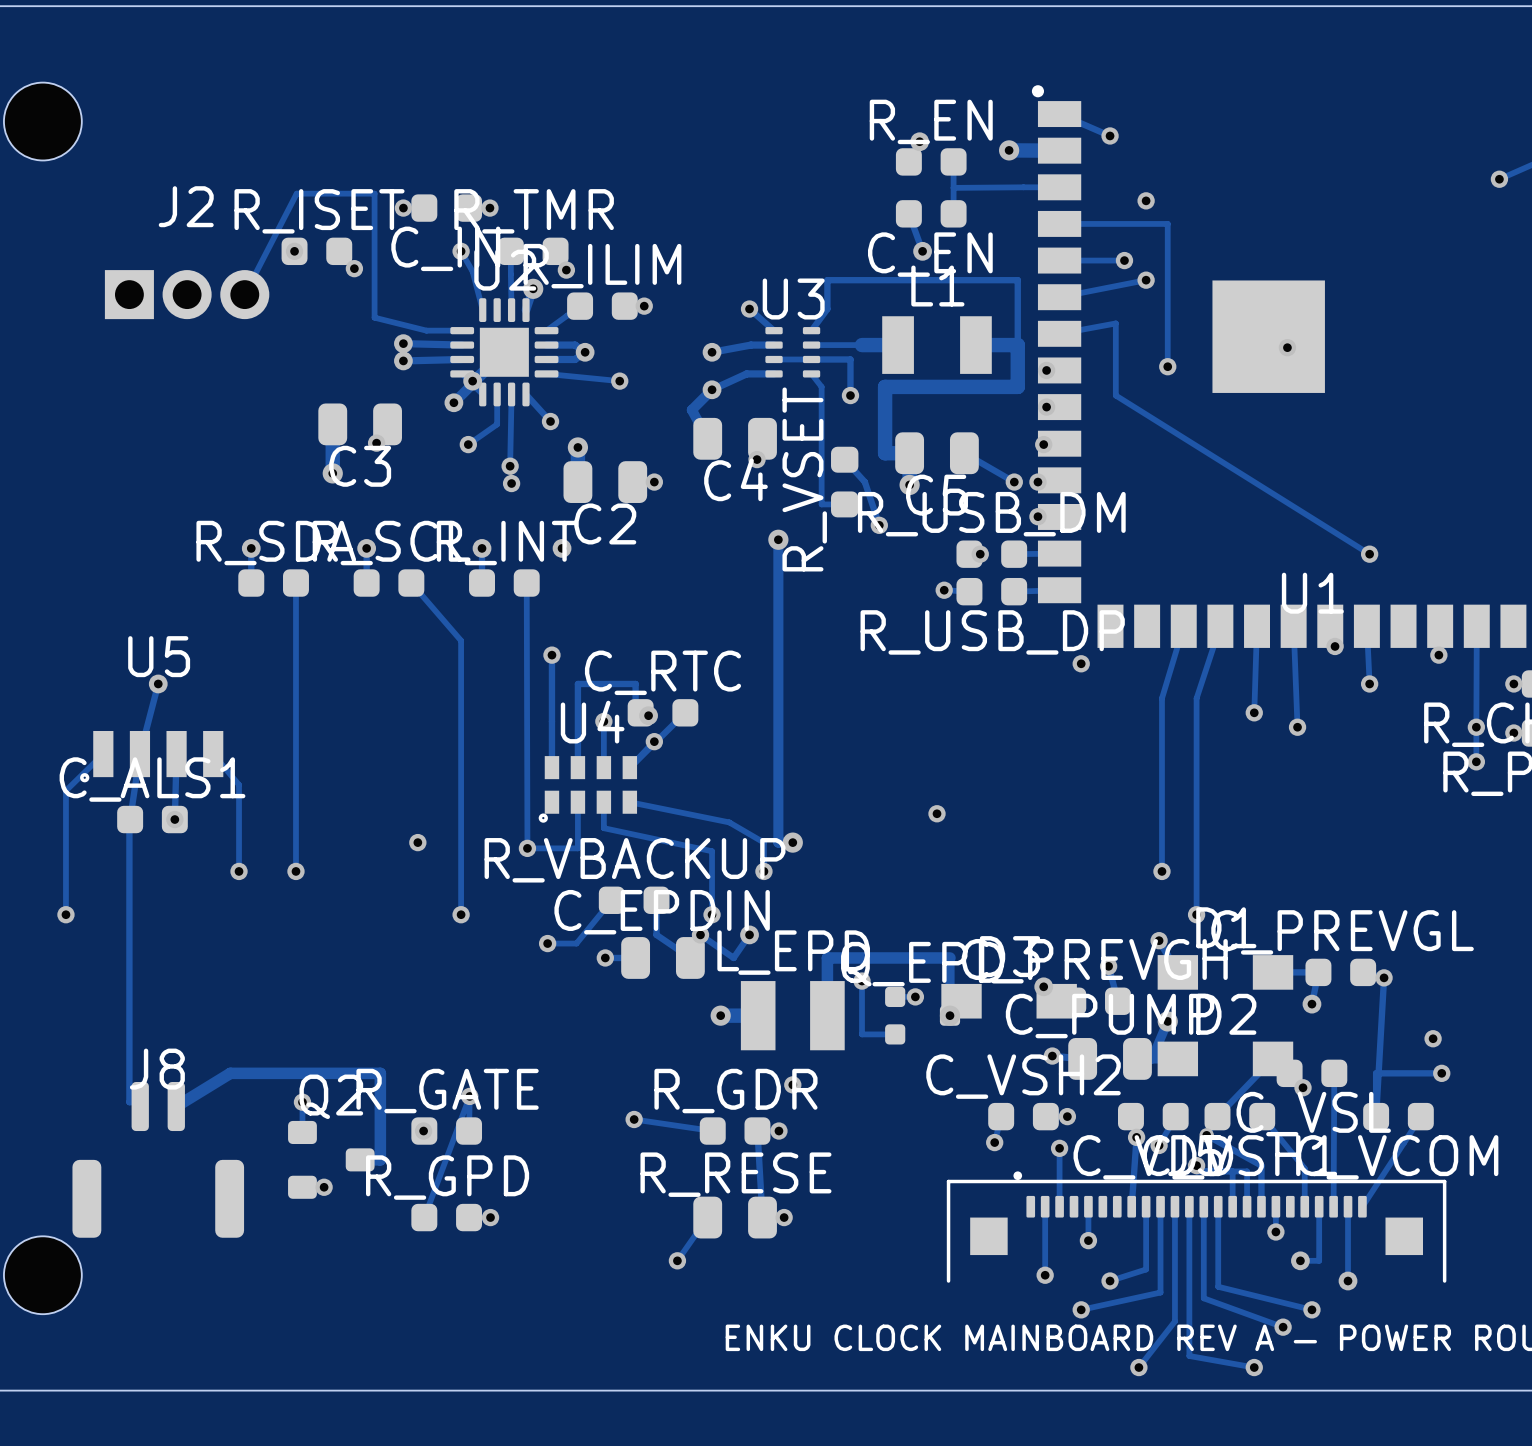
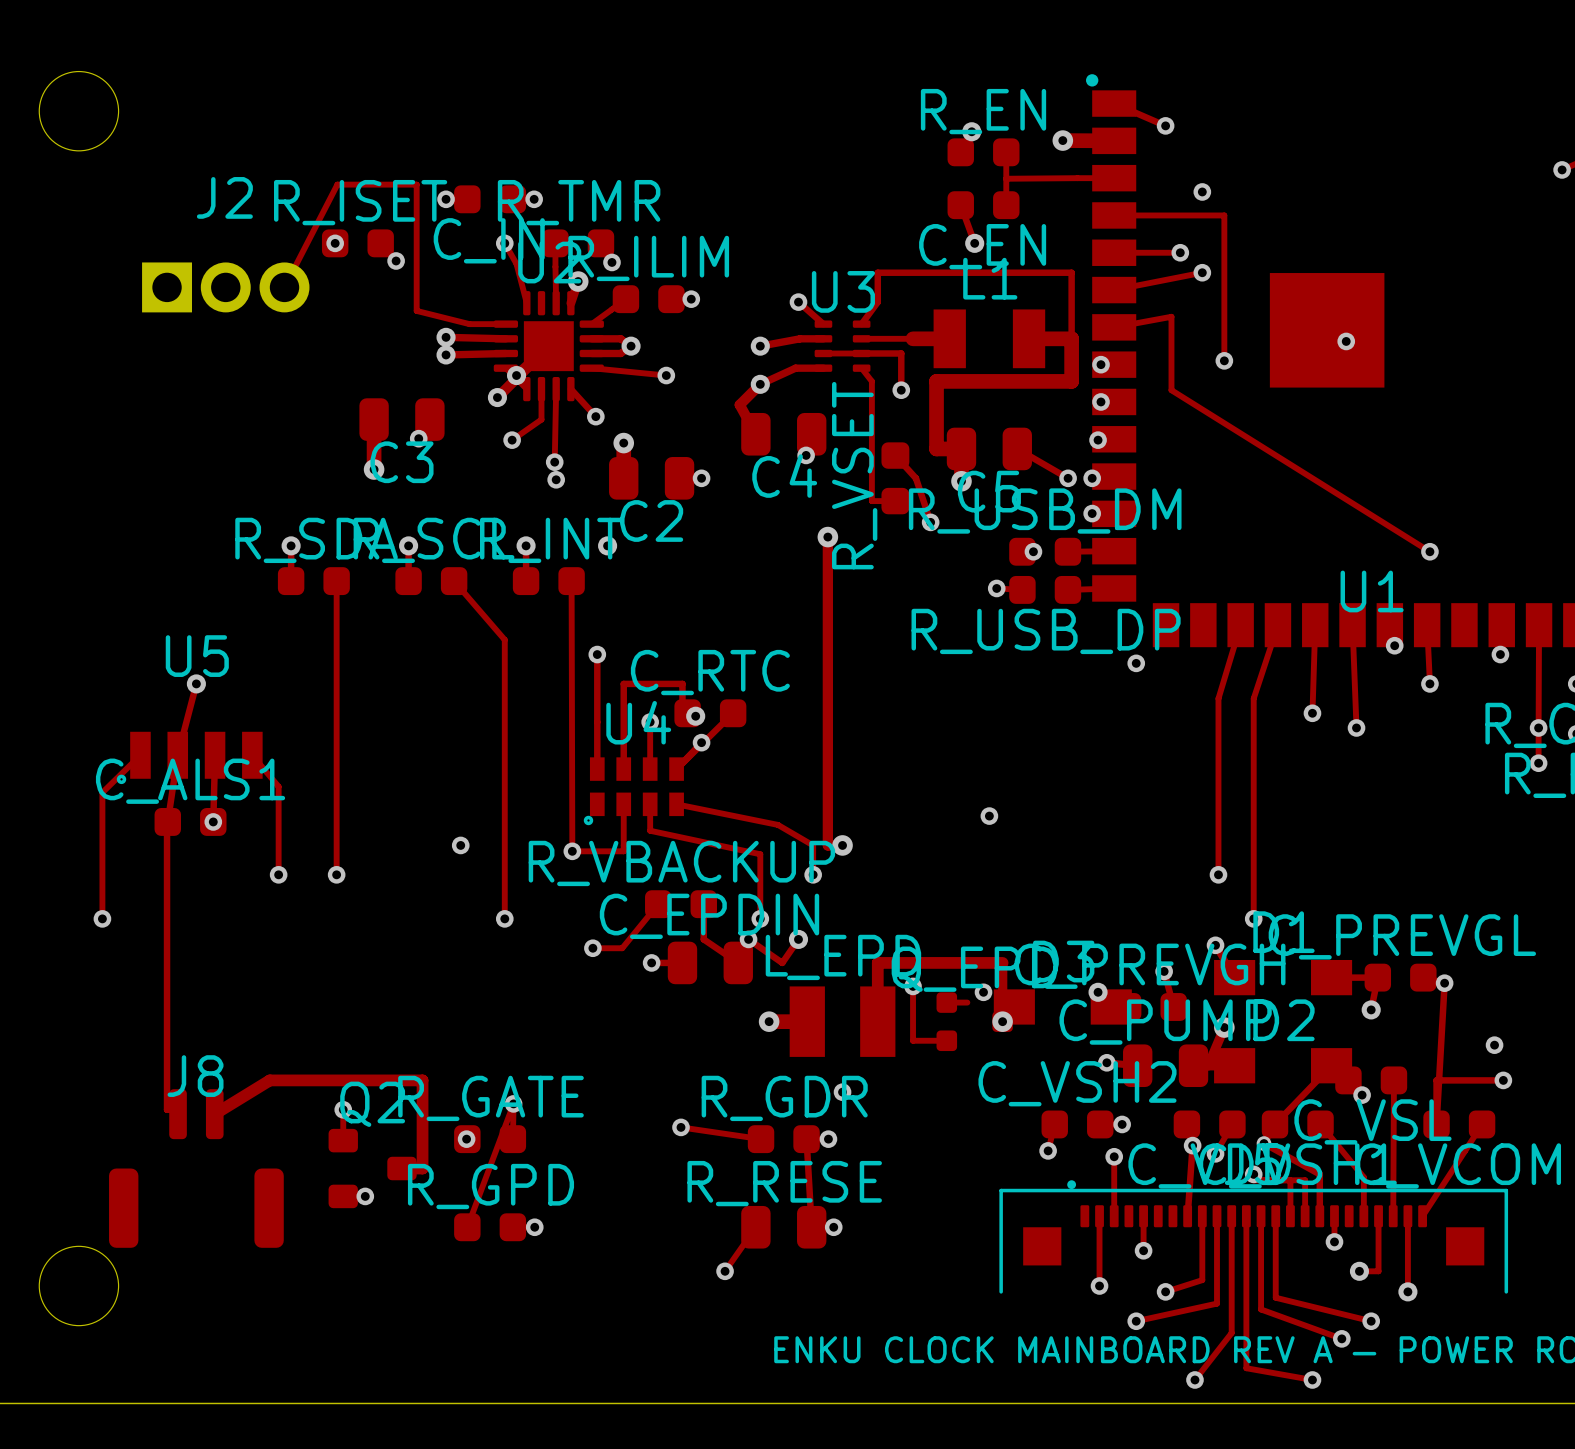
via position: (915, 996) -> (983, 992)

